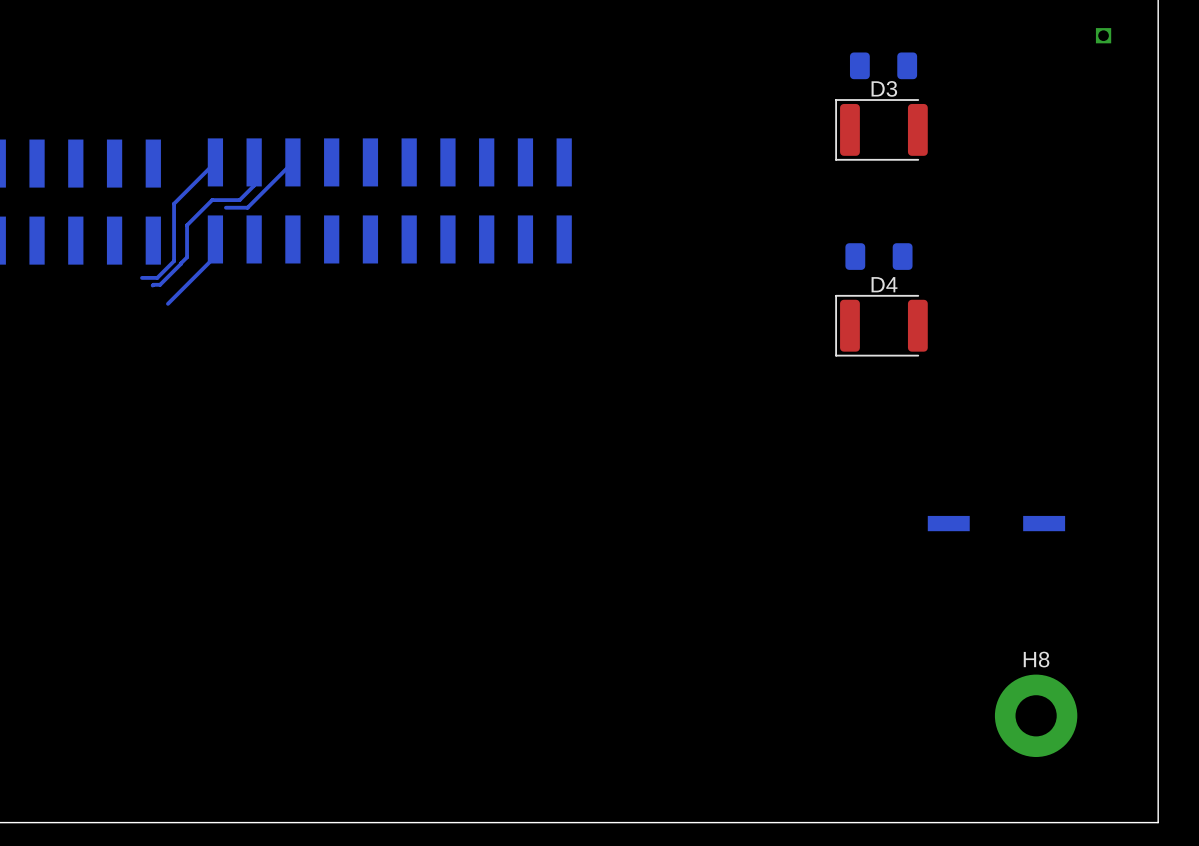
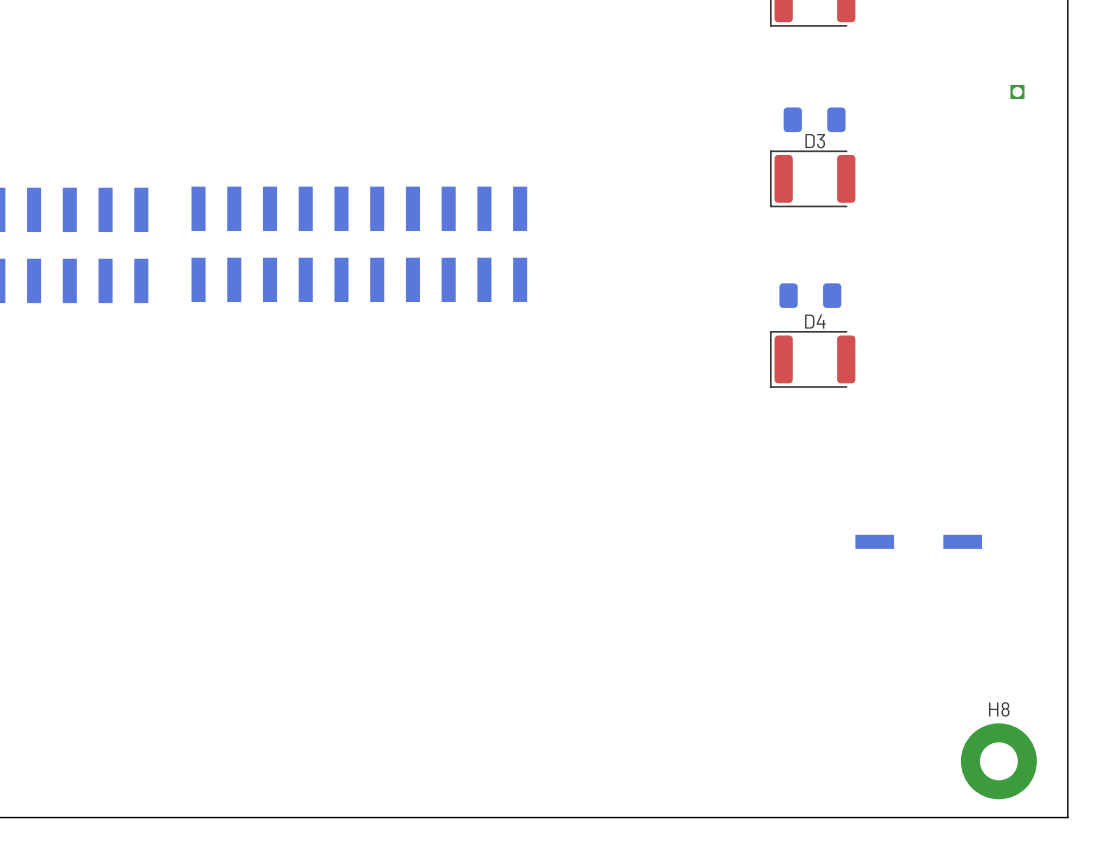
bottom track: (215, 162) (174, 203) (174, 261) (157, 277) (142, 277) -> none
bottom track: (254, 162) (254, 185) (239, 200) (212, 200) (187, 225) (187, 257) (160, 284) (152, 285) -> none
bottom track: (292, 162) (247, 207) (225, 207) -> none
bottom track: (215, 239) (215, 256) (167, 303) -> none
H8 position: (1036, 715) -> (998, 761)

